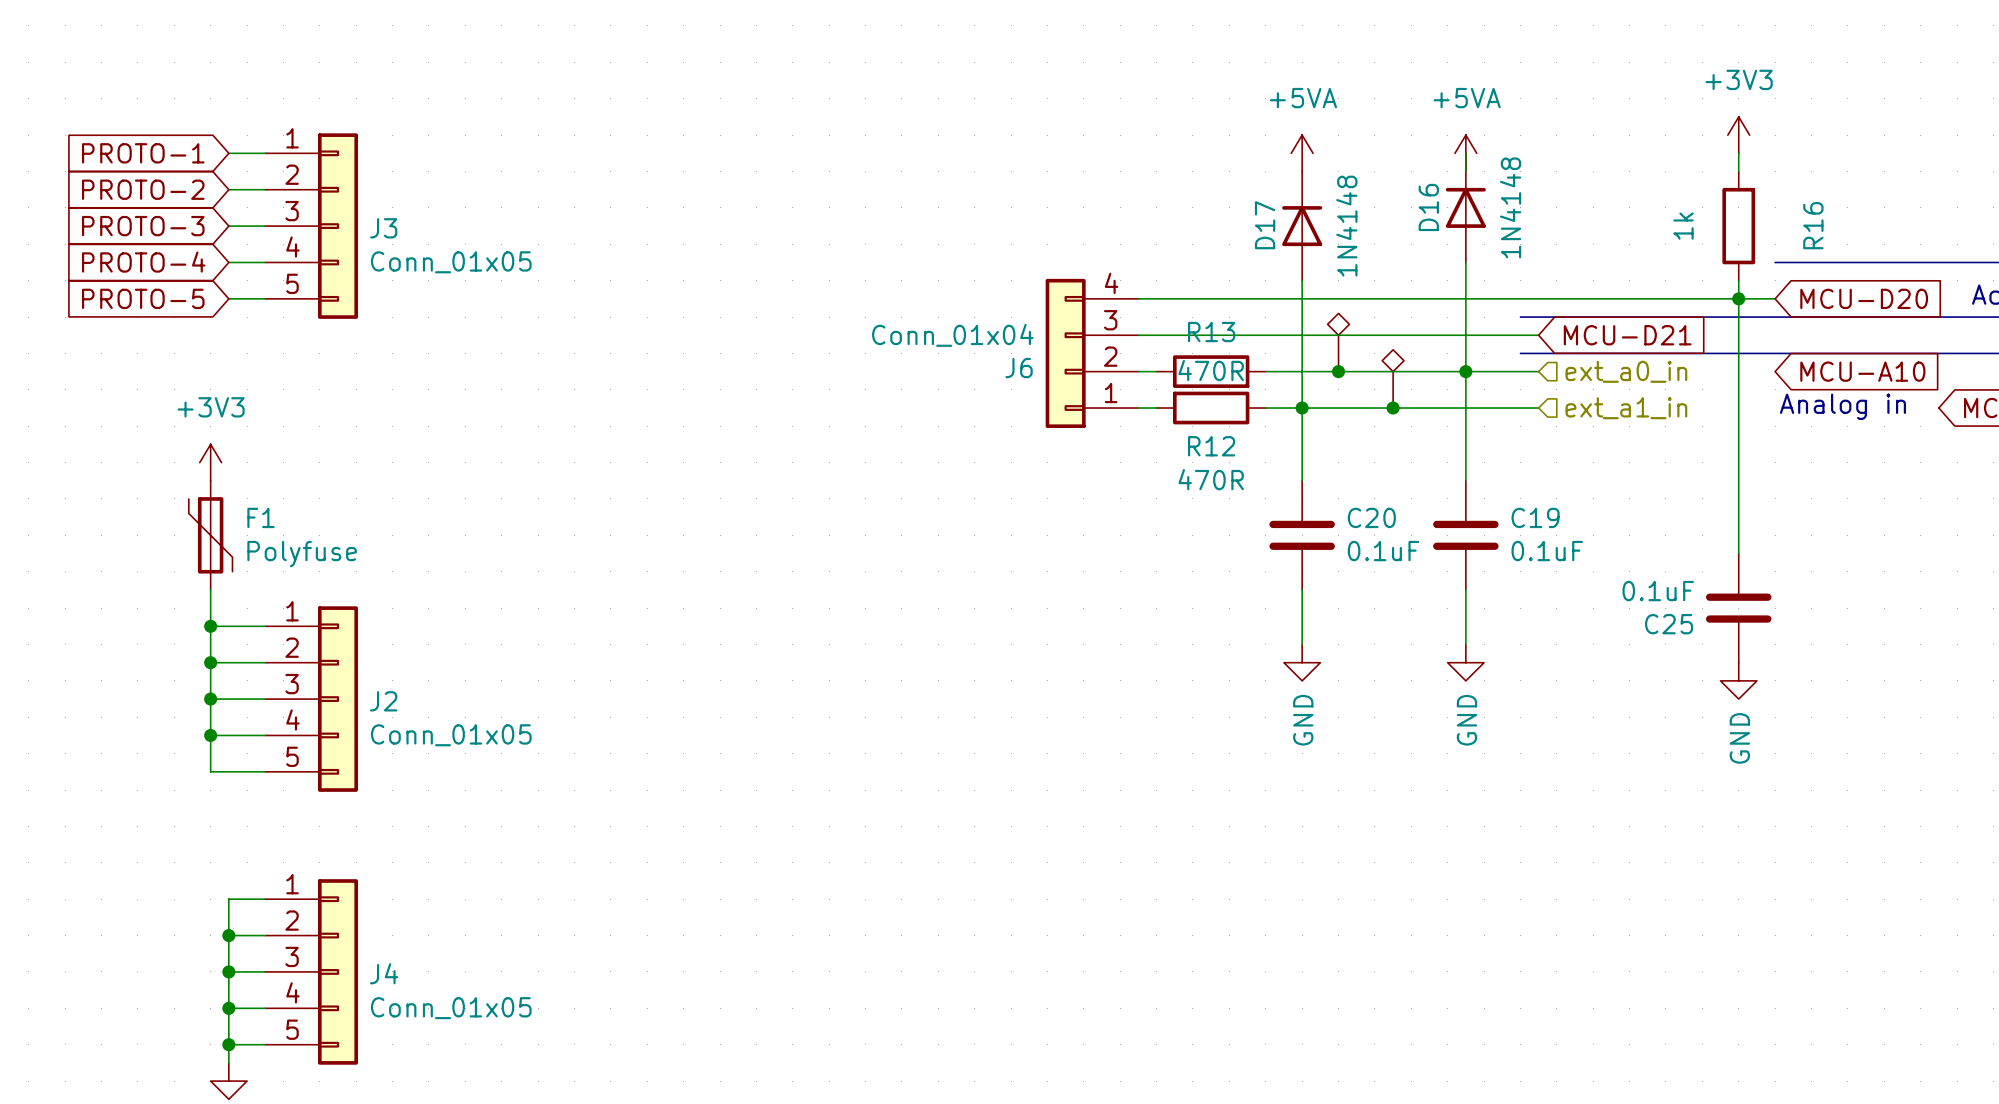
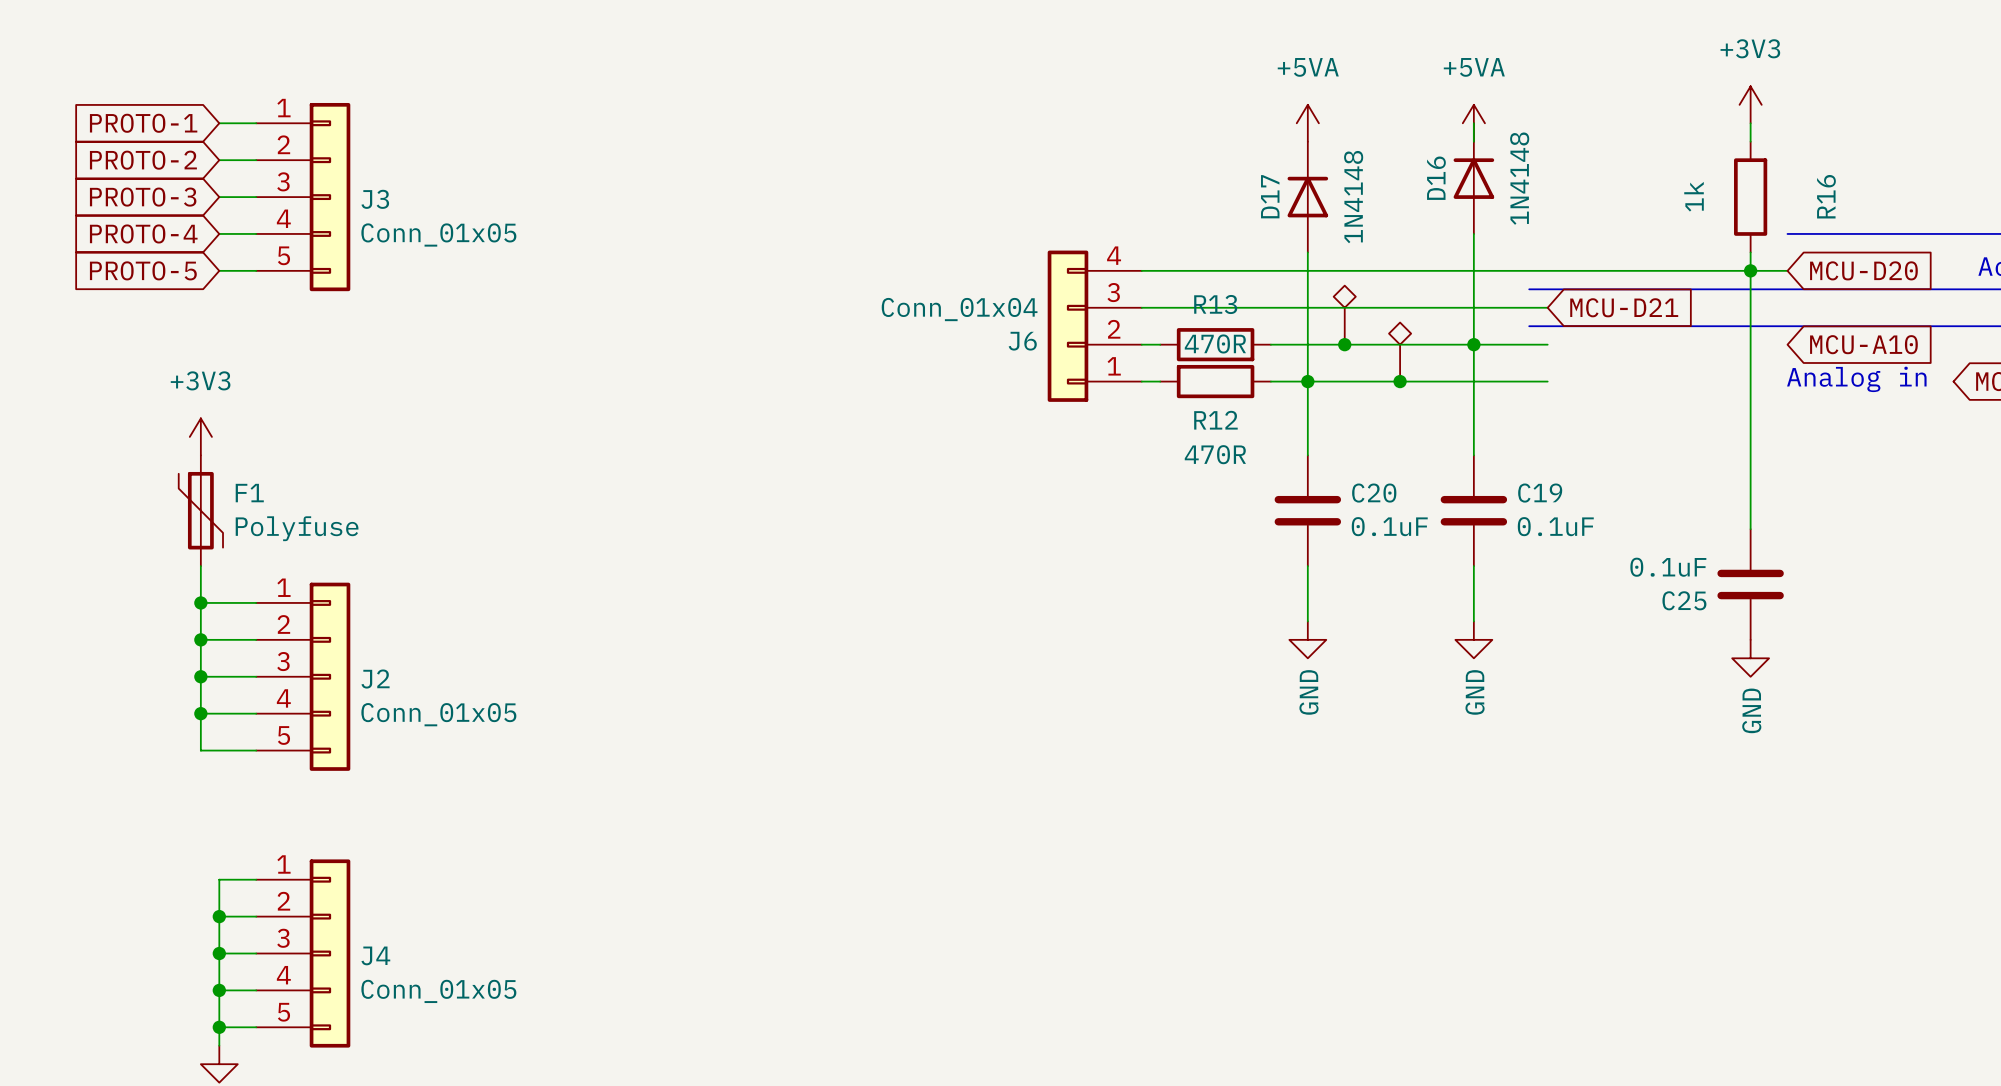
hierarchical label: ext_a0_in (1626, 371) -> none
hierarchical label: ext_a1_in (1626, 408) -> none

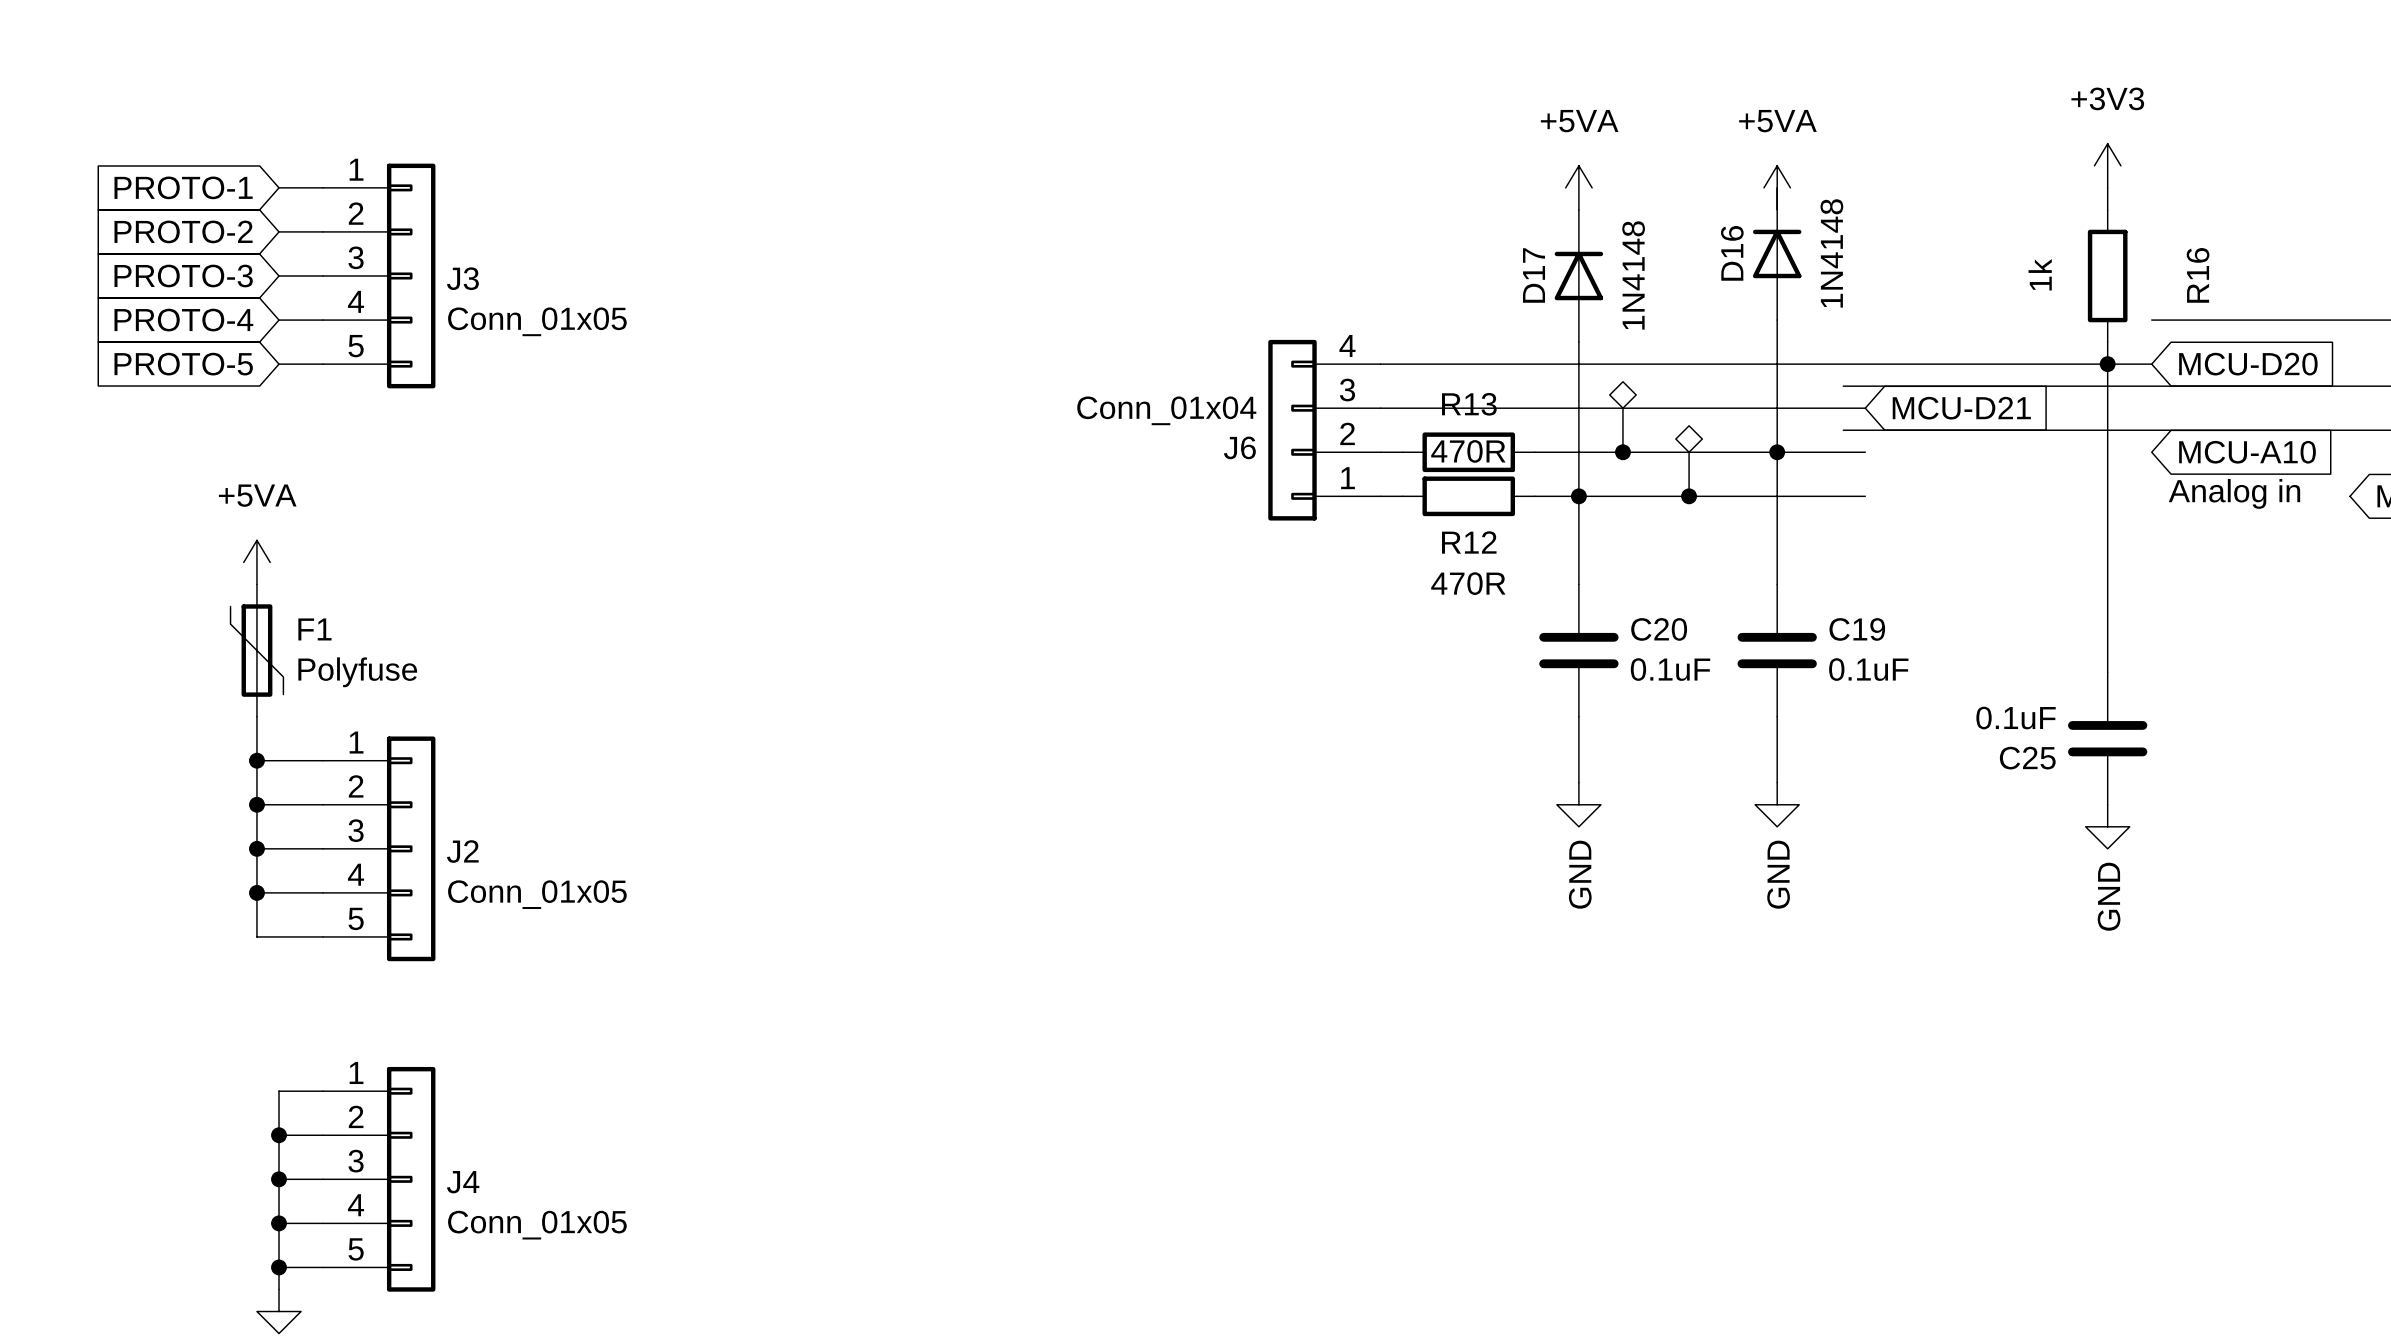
power symbol: +3V3 (200, 436) -> +5VA (256, 562)

